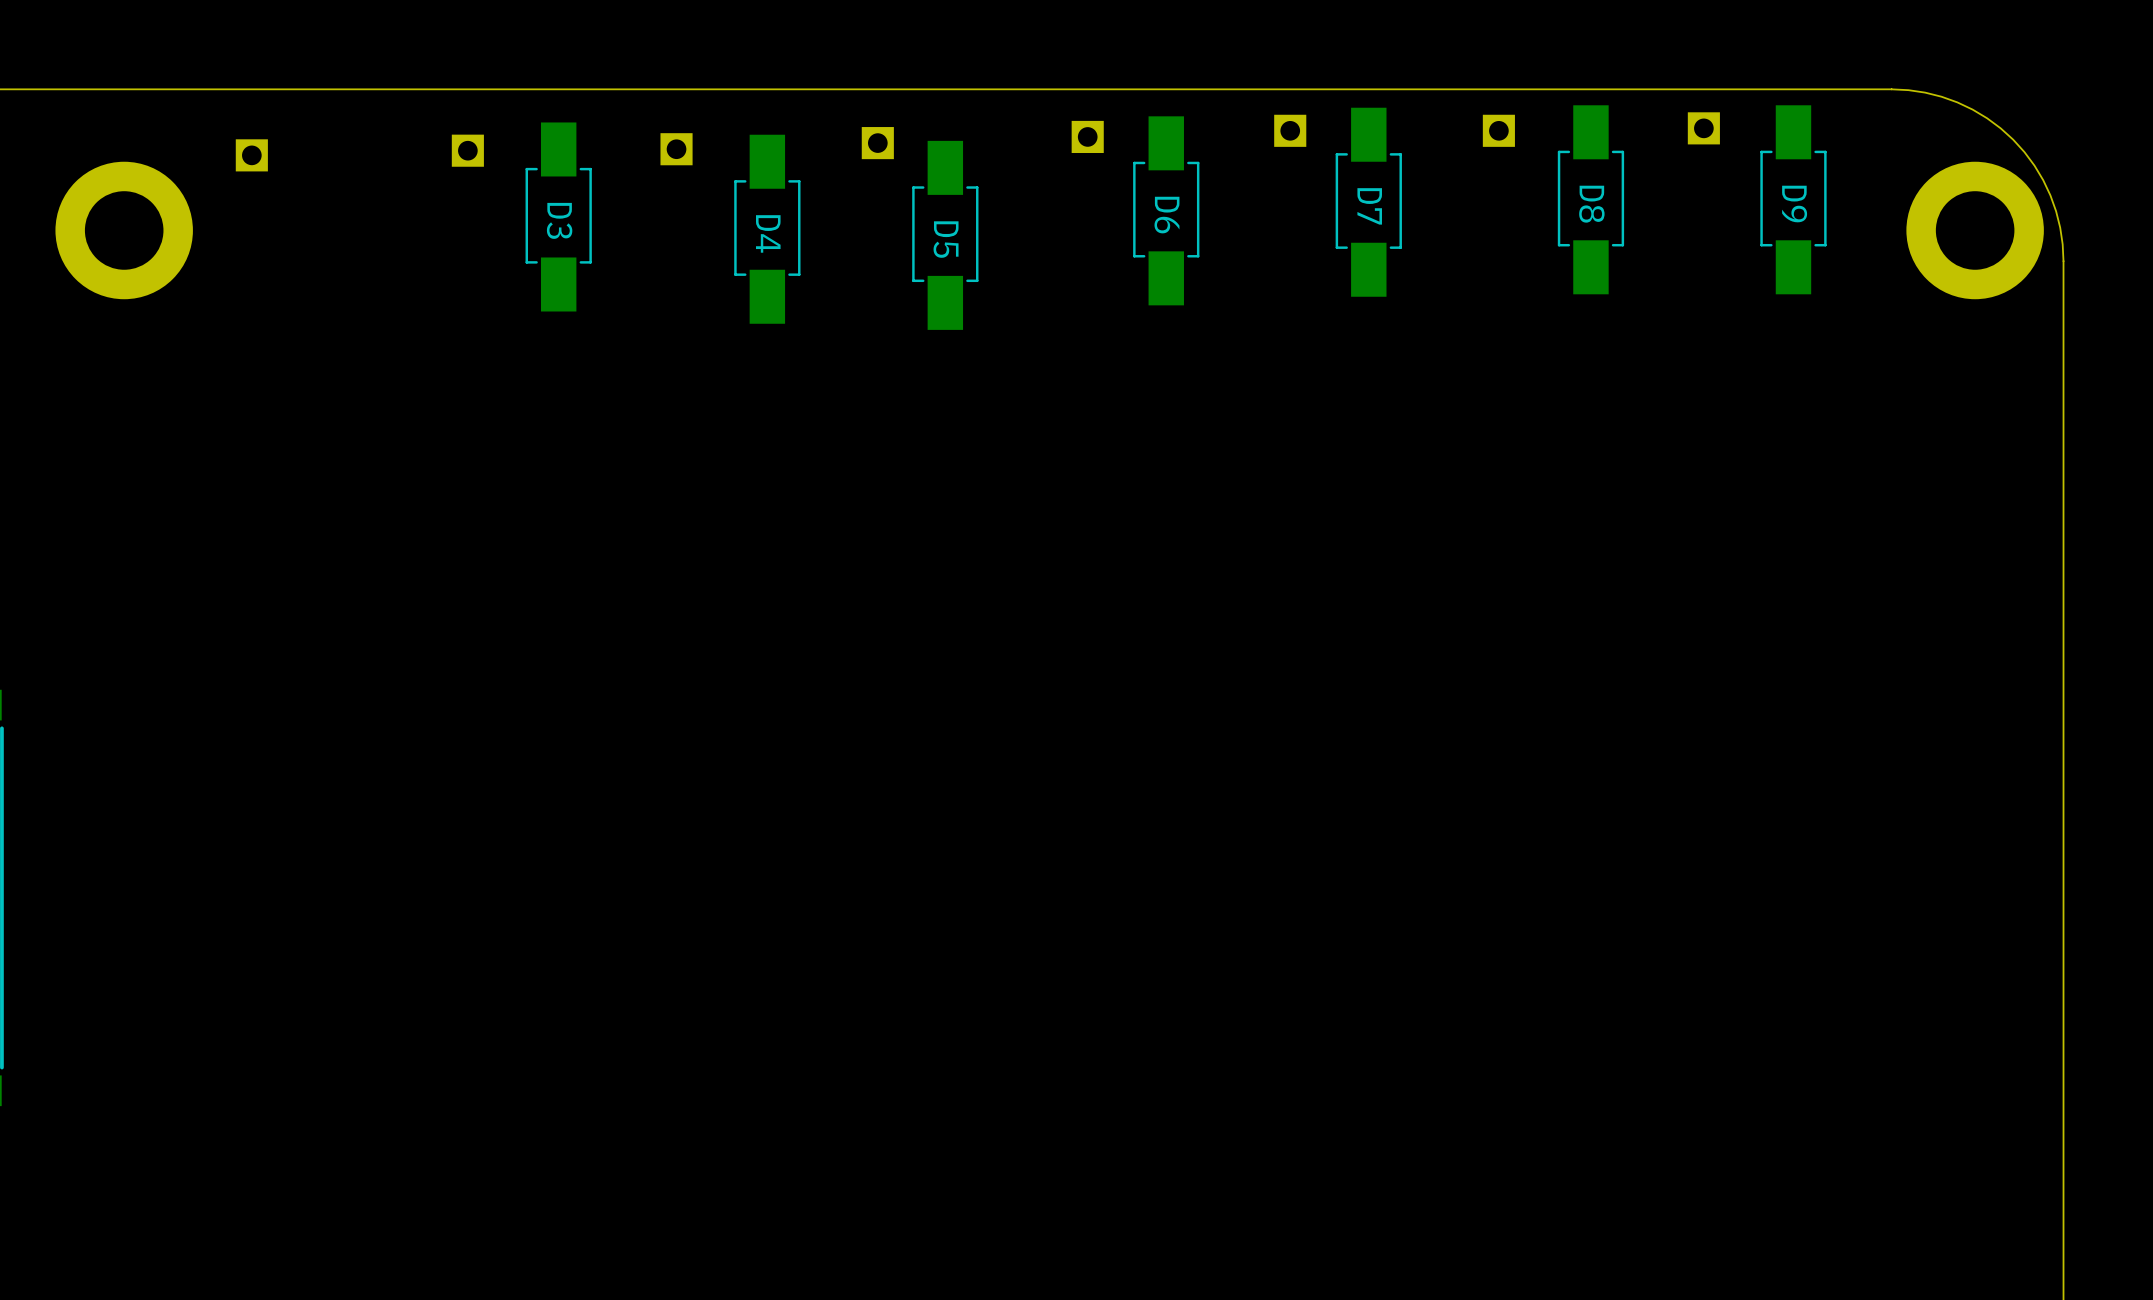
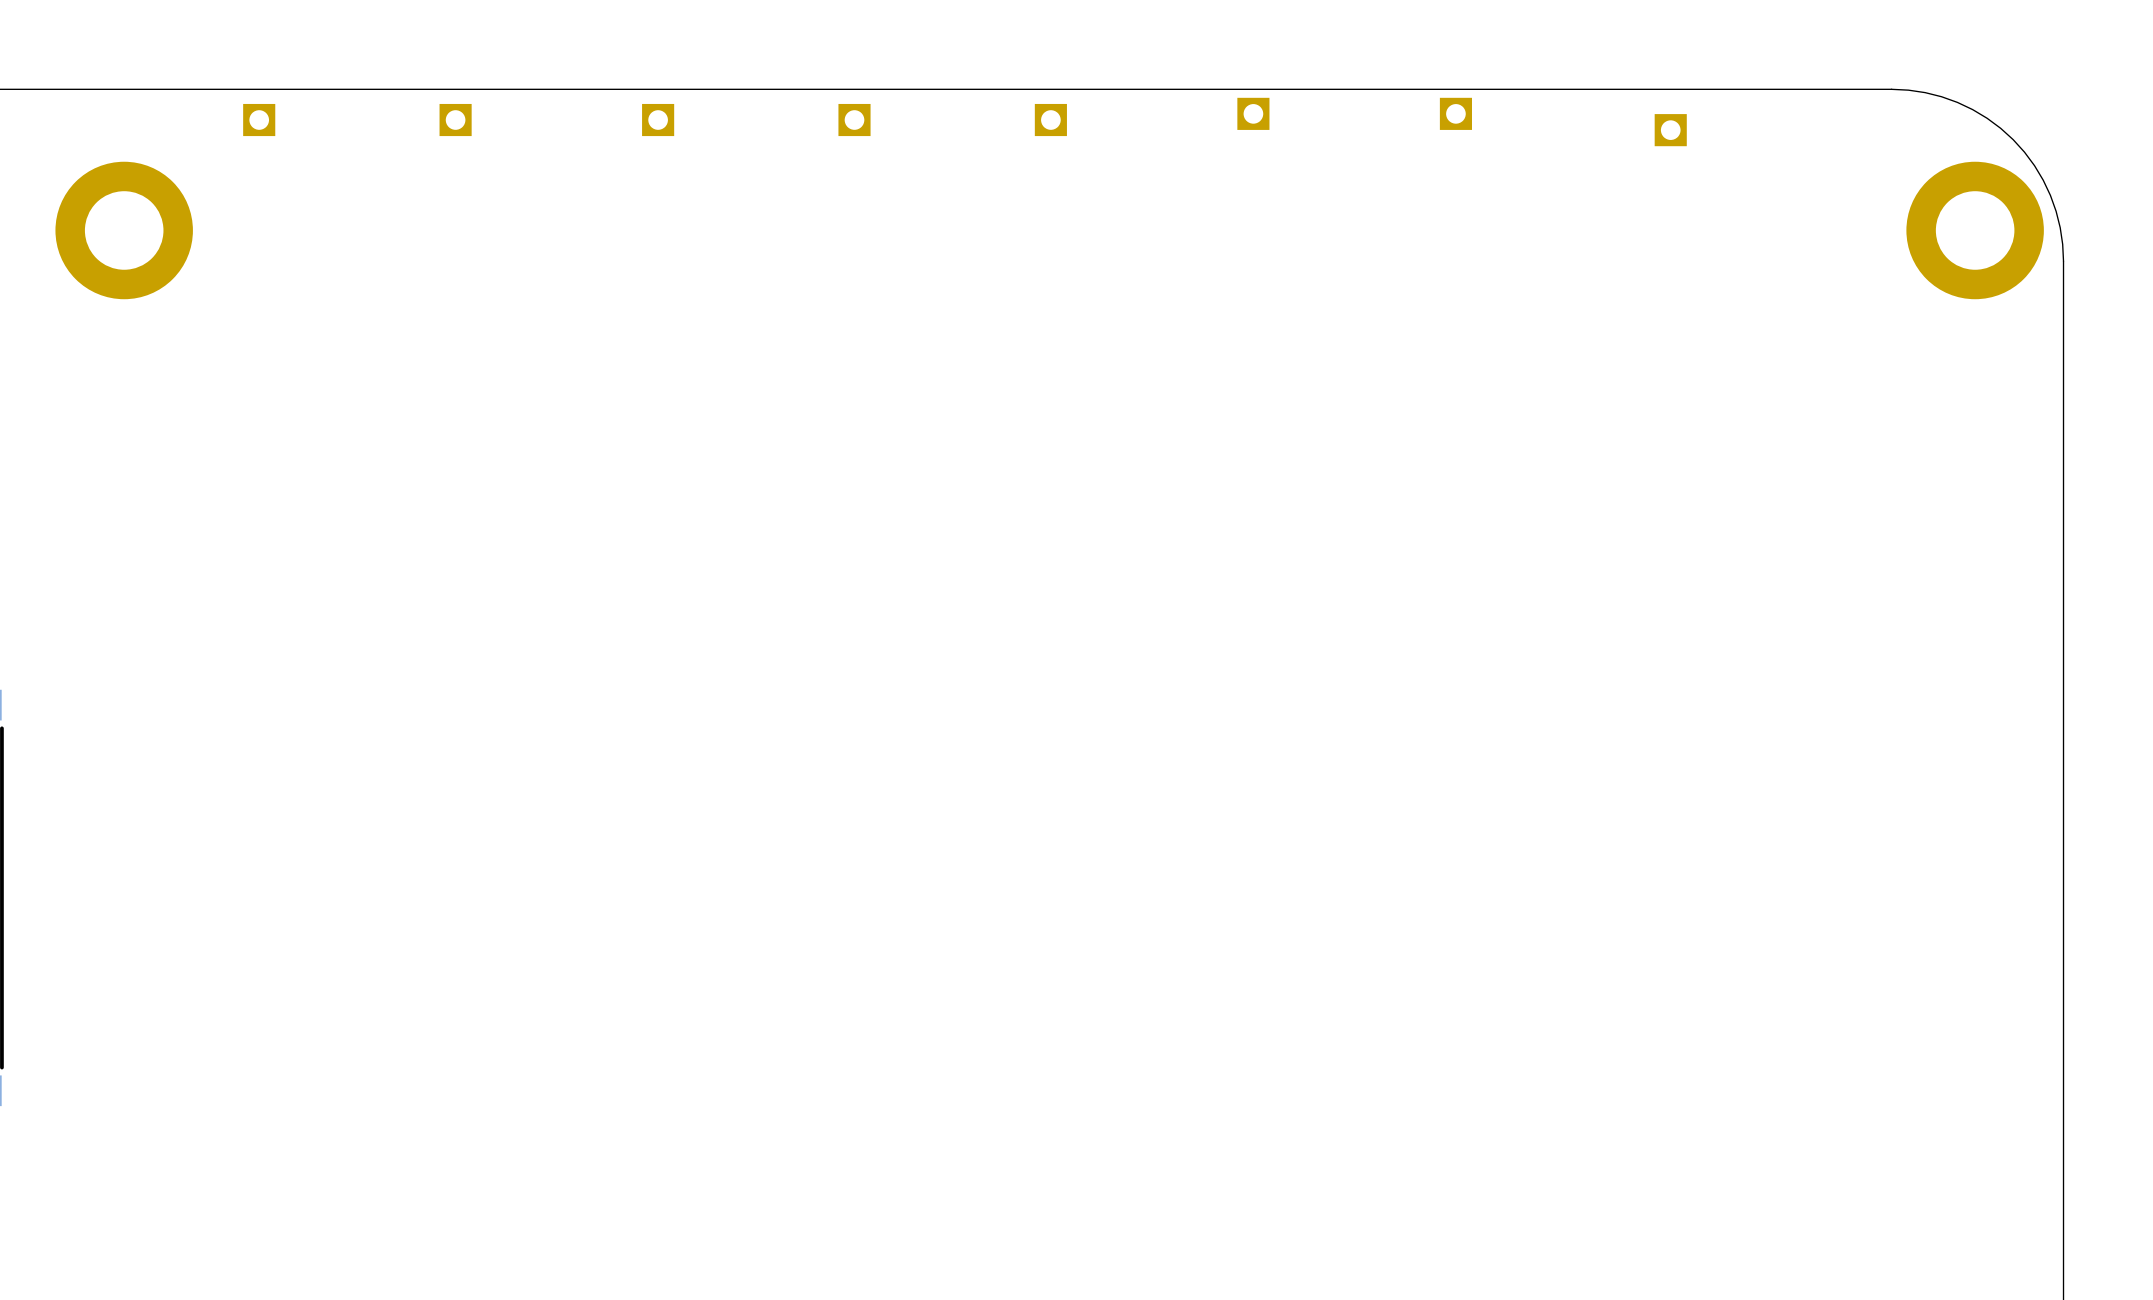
part position: (1703, 128) -> (1670, 130)
part position: (1290, 130) -> (1253, 113)
part position: (1498, 130) -> (1455, 113)
part position: (1087, 136) -> (1050, 120)
part position: (877, 143) -> (854, 120)
part position: (676, 149) -> (658, 120)
part position: (467, 150) -> (455, 120)
part position: (251, 155) -> (259, 120)
D8: (1590, 199) -> none
D9: (1793, 199) -> none
D7: (1368, 202) -> none
D6: (1166, 210) -> none
D3: (558, 216) -> none
D4: (767, 229) -> none
D5: (945, 235) -> none

